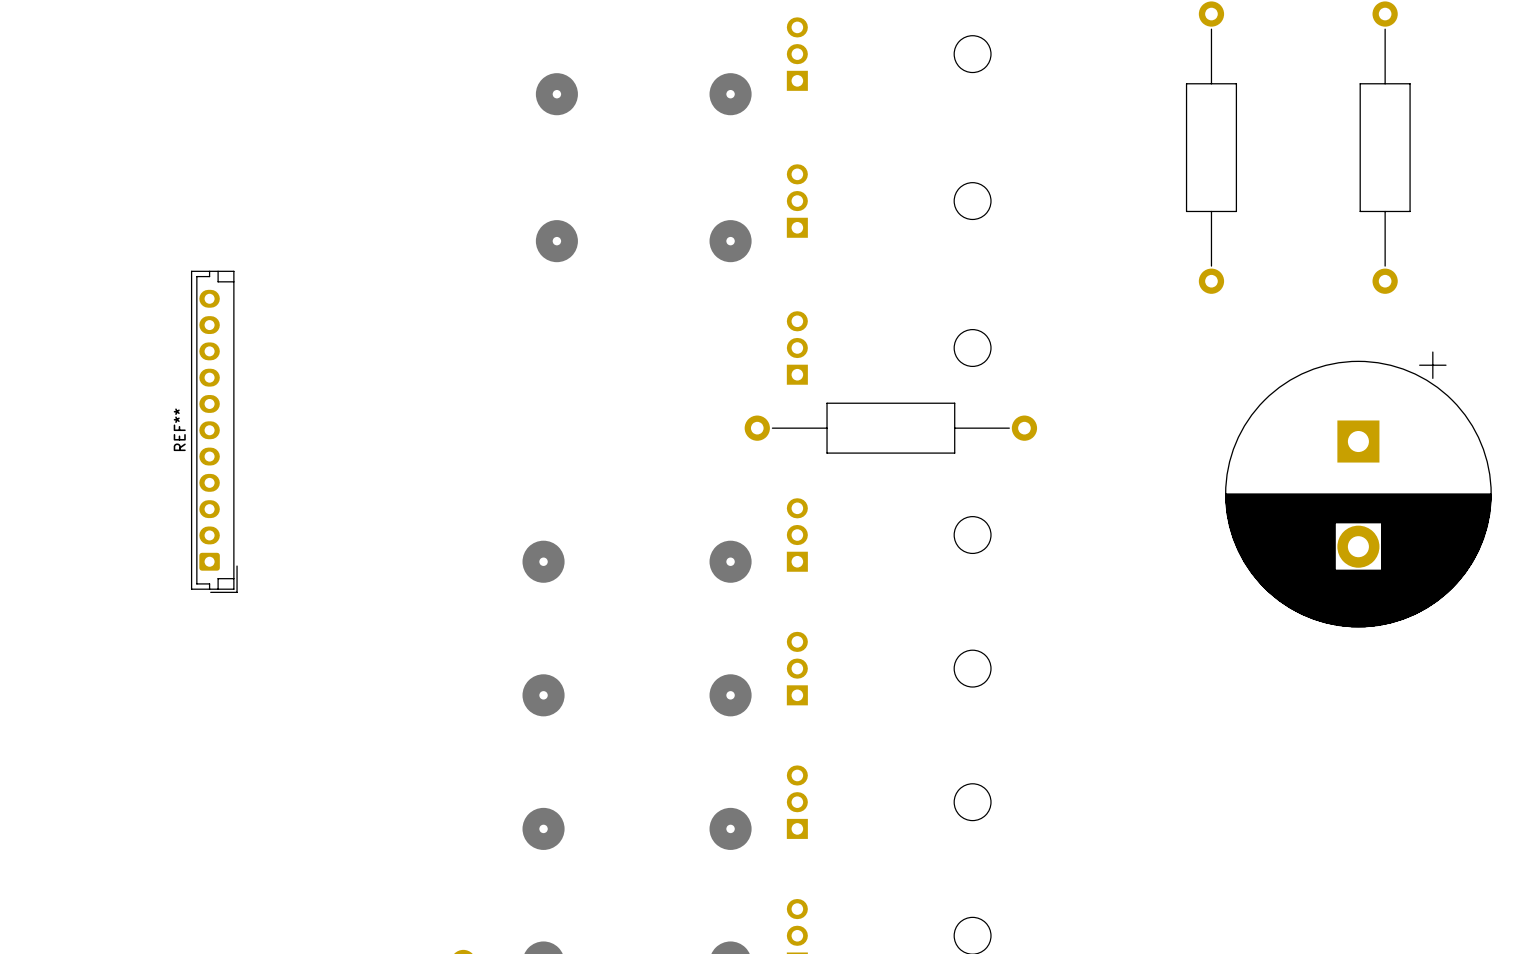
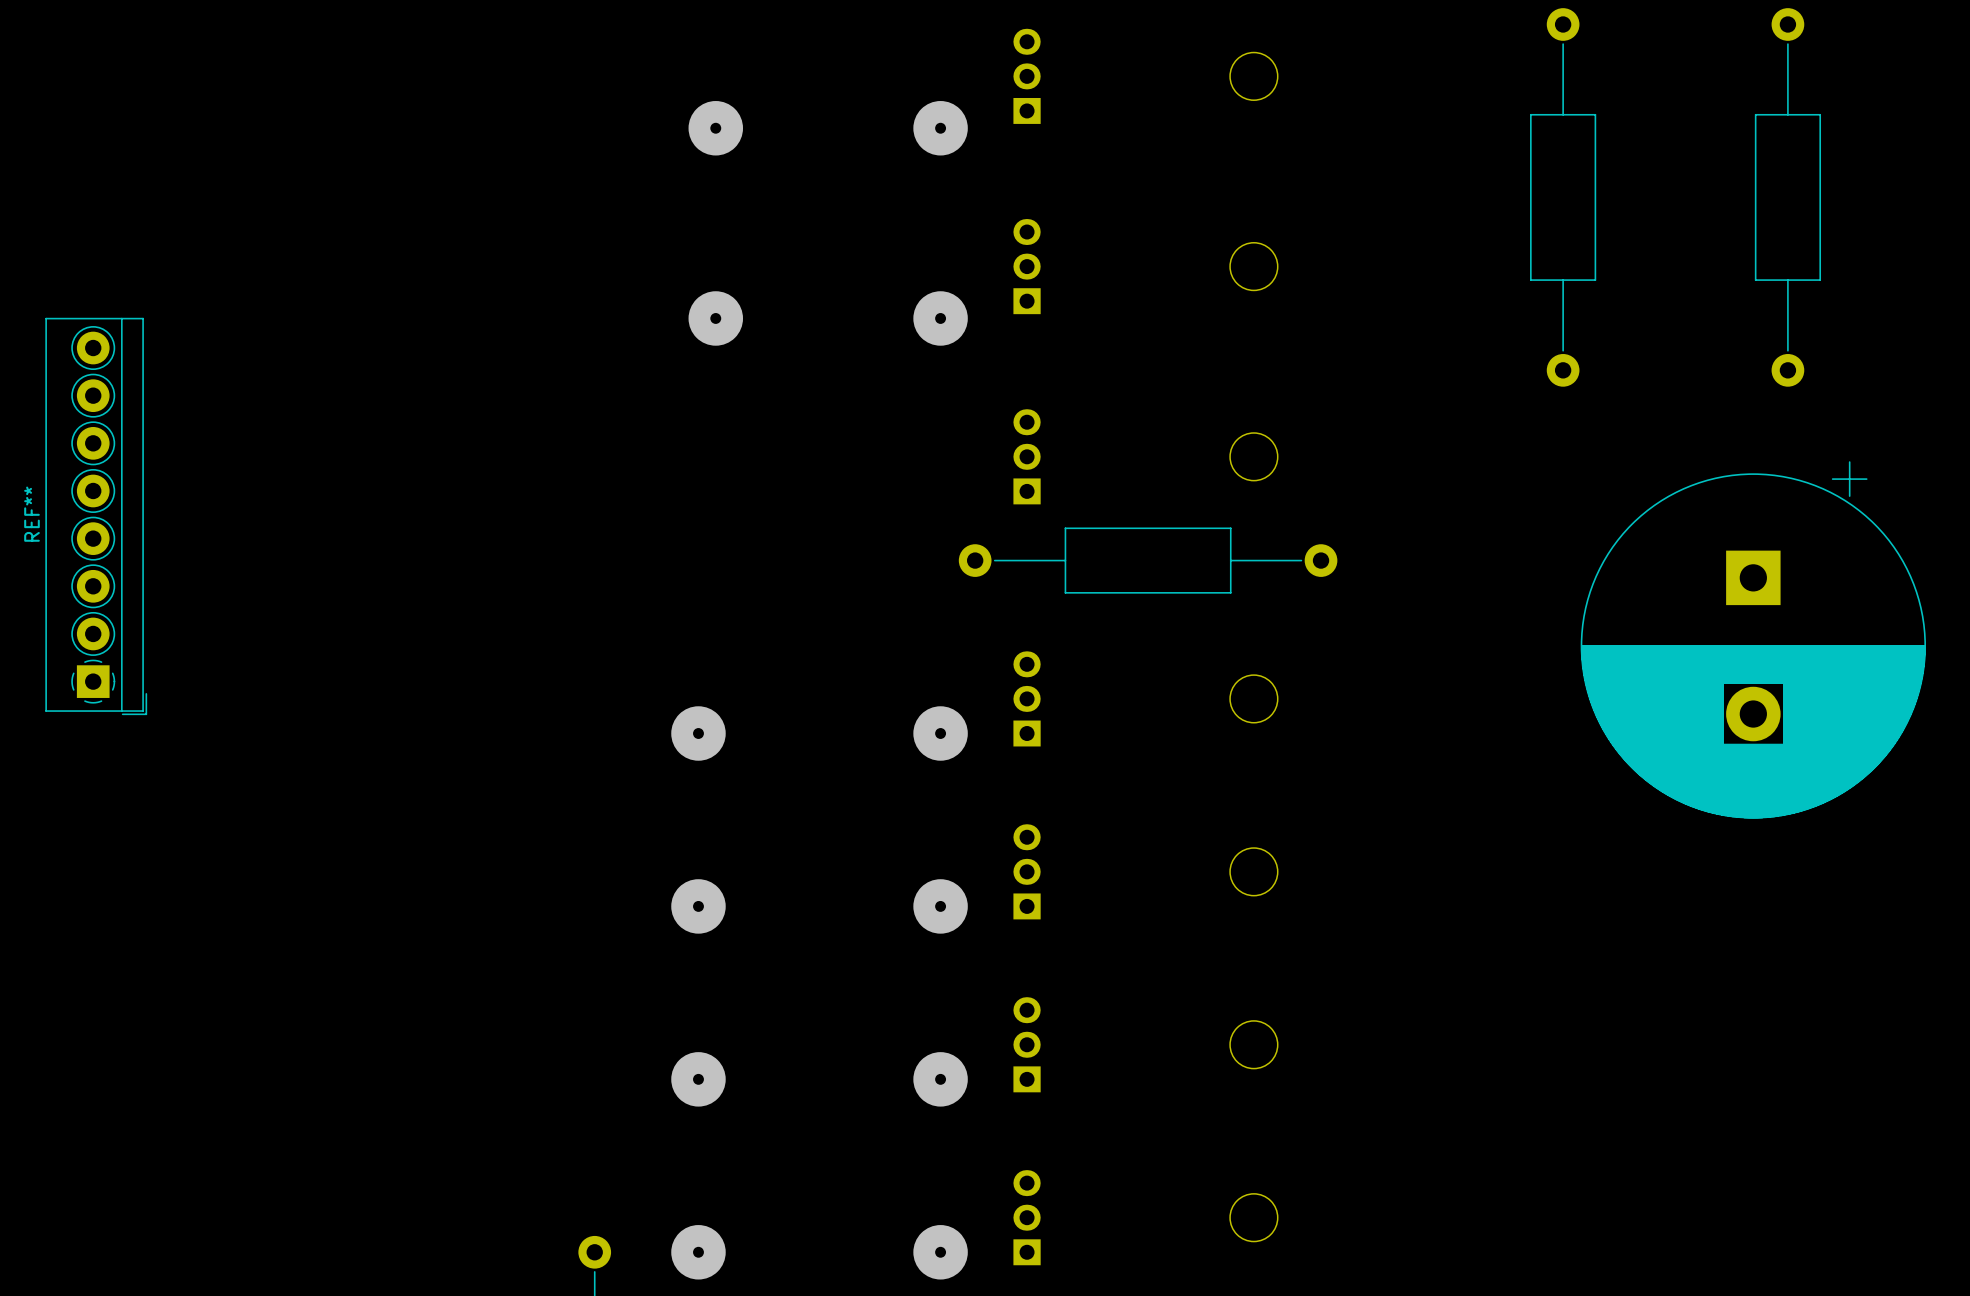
REF**: none -> (96, 516)
REF**: (214, 431) -> none

